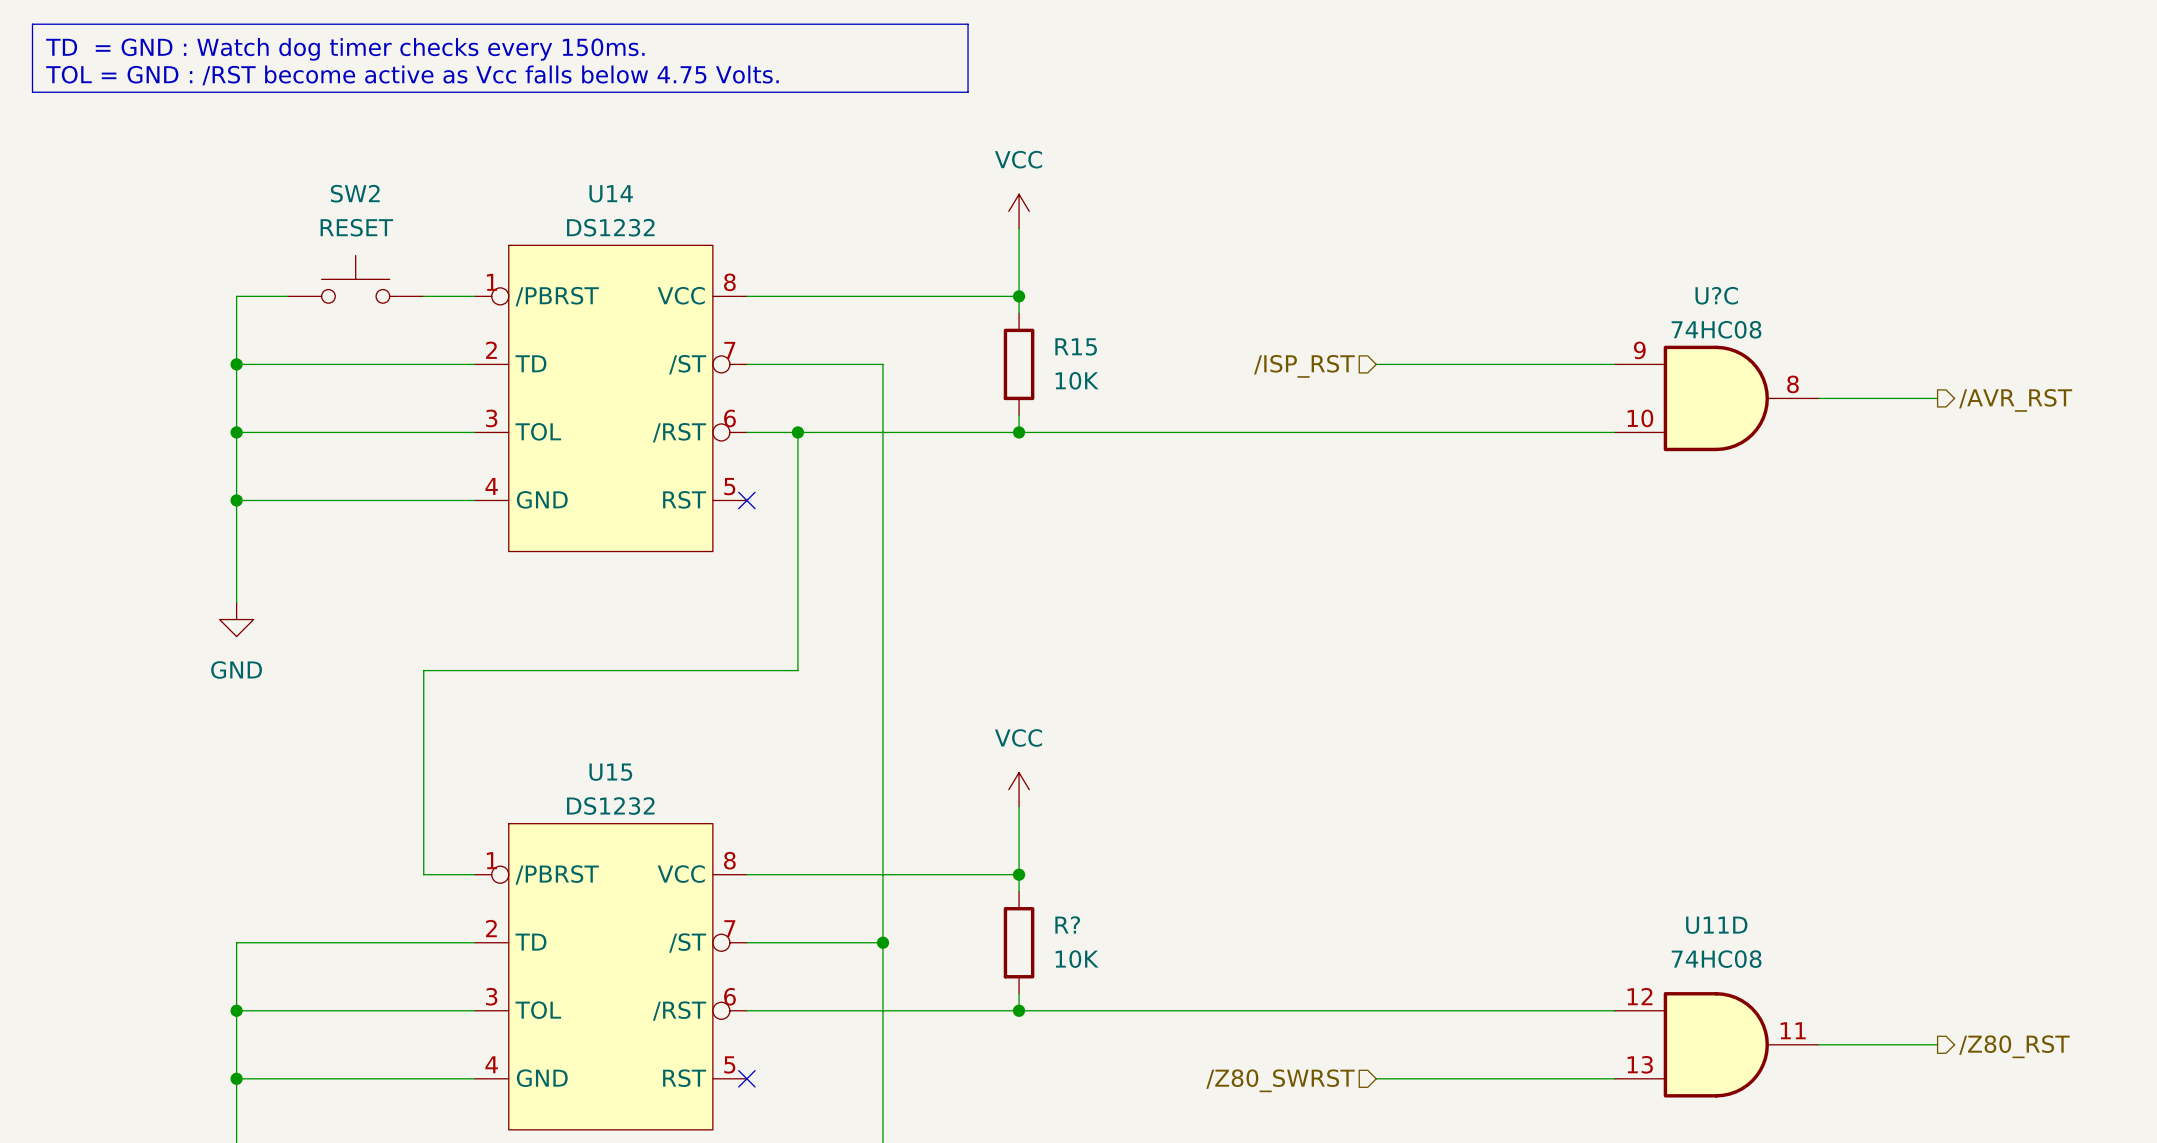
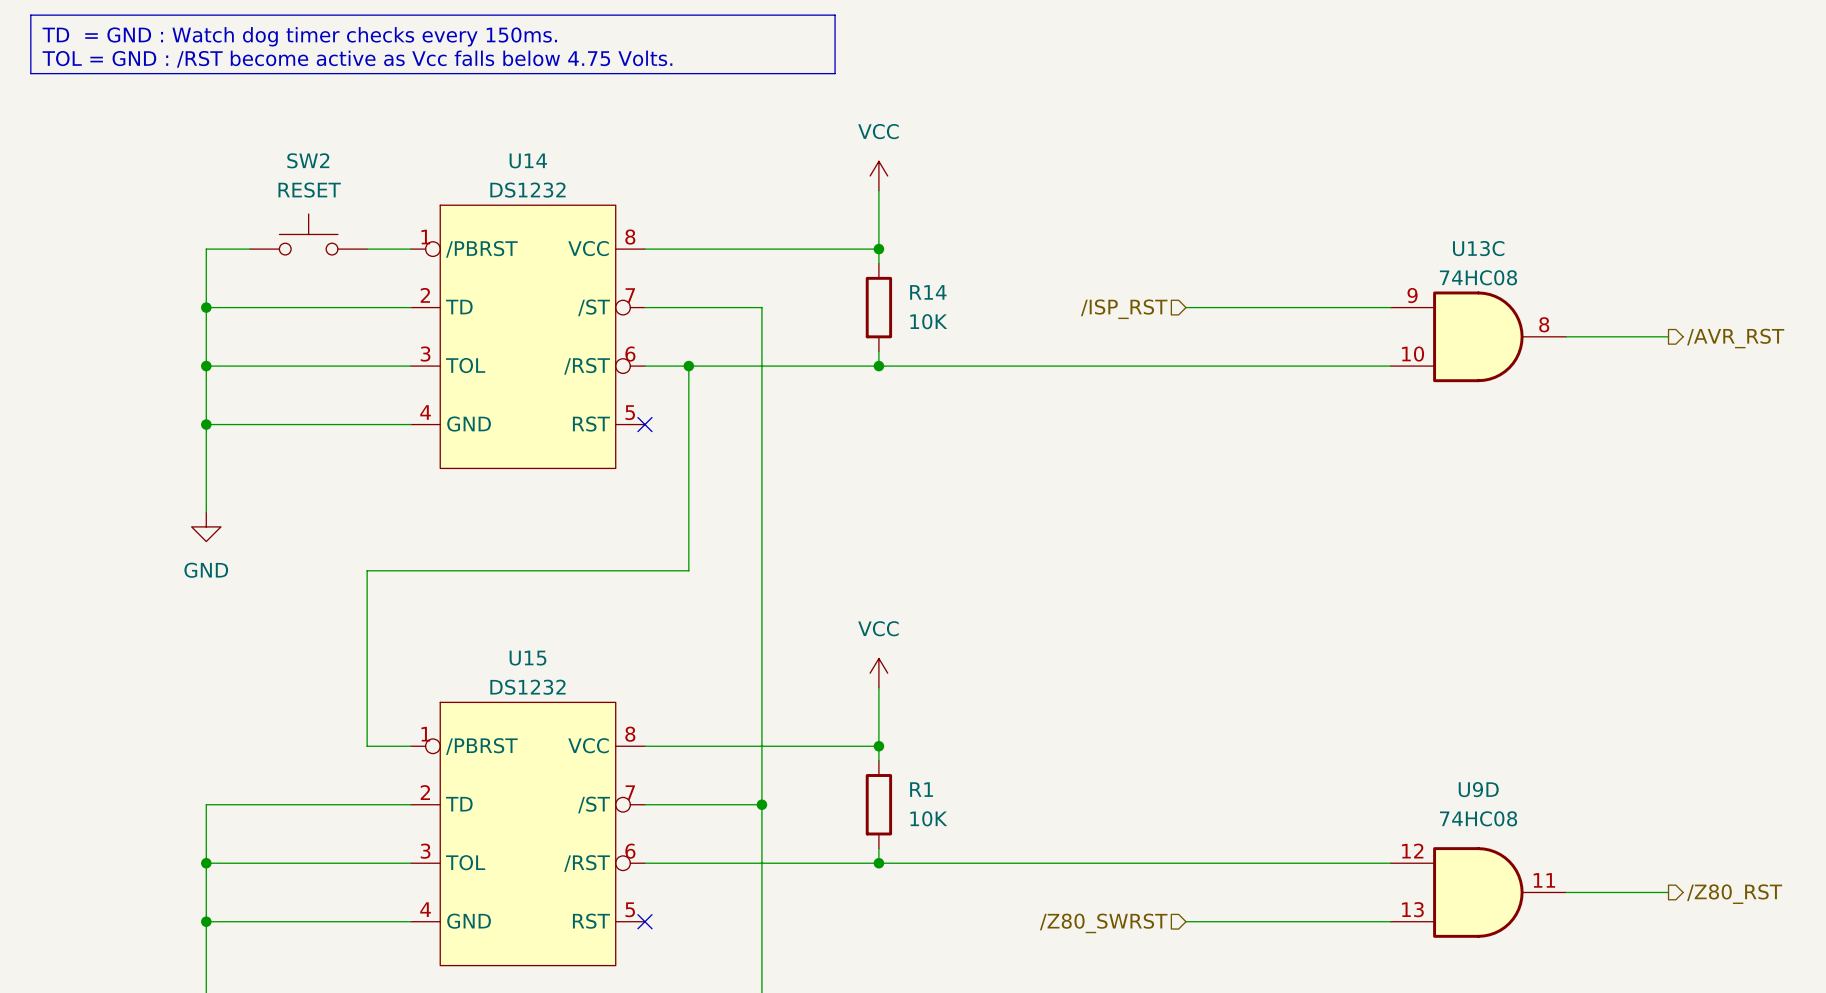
U?C name: U?C (1716, 295) -> U13C (1478, 248)
R15 name: R15 (1076, 346) -> R14 (928, 292)
R? name: R? (1067, 924) -> R1 (921, 789)
U11D name: U11D (1716, 925) -> U9D (1478, 789)

